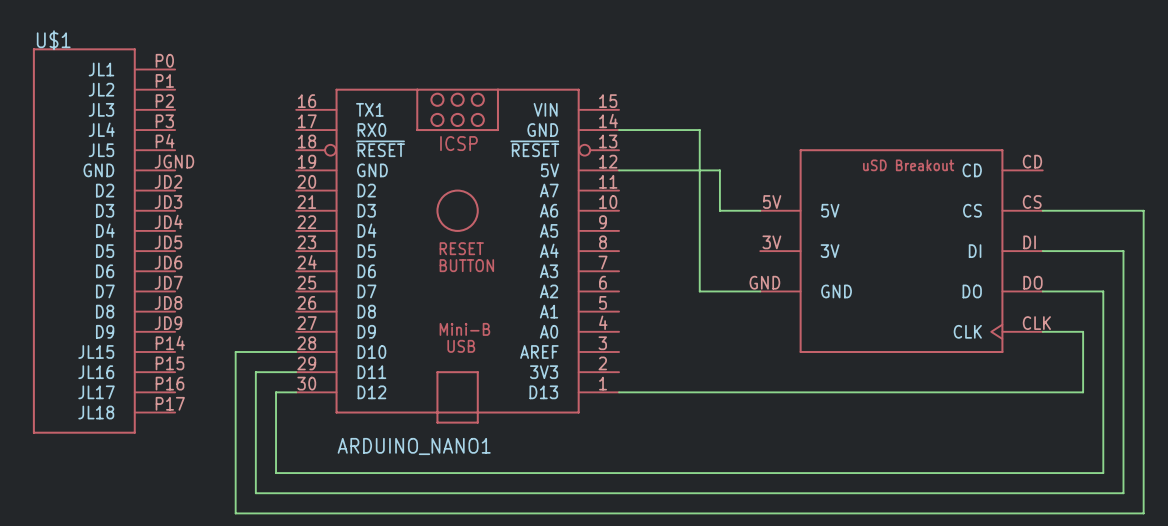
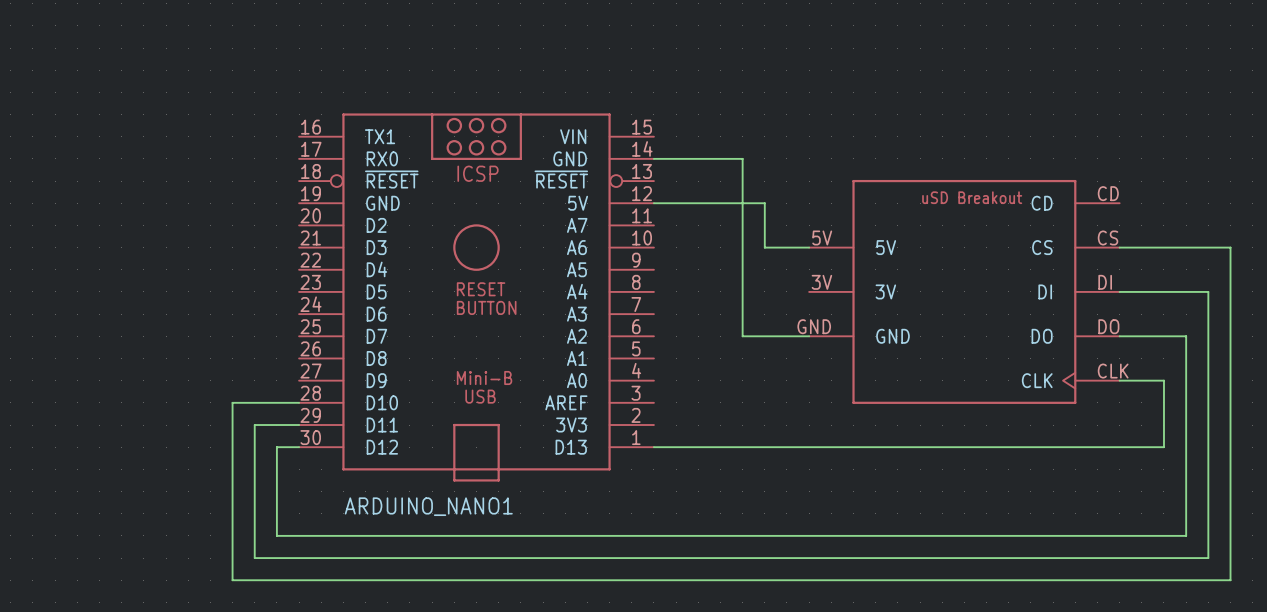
U$1: (104, 241) -> none

